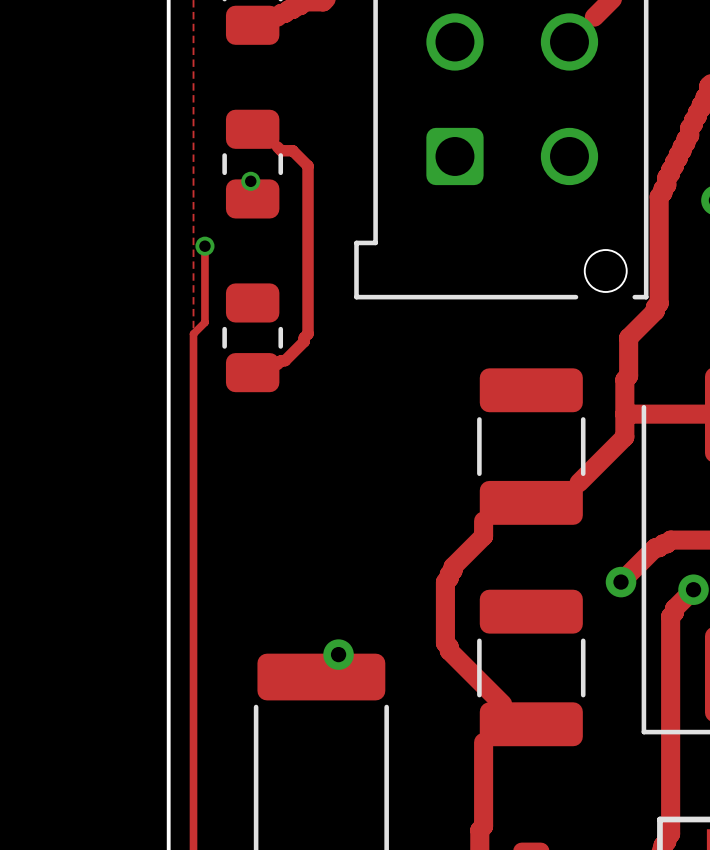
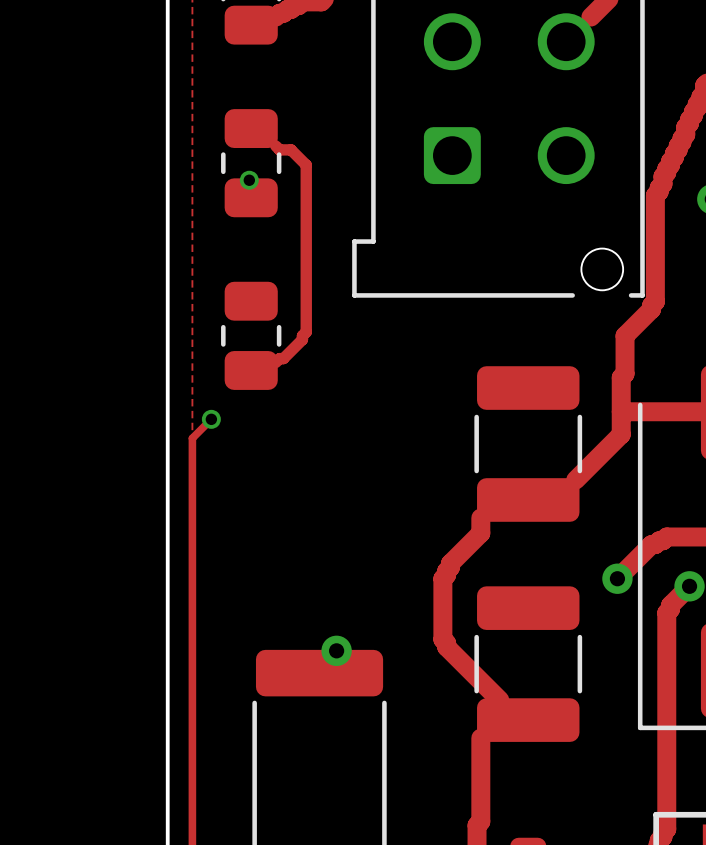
track: (204, 246) (204, 322) (193, 333) (193, 440) -> (211, 419) (192, 438)
via position: (204, 246) -> (211, 419)

